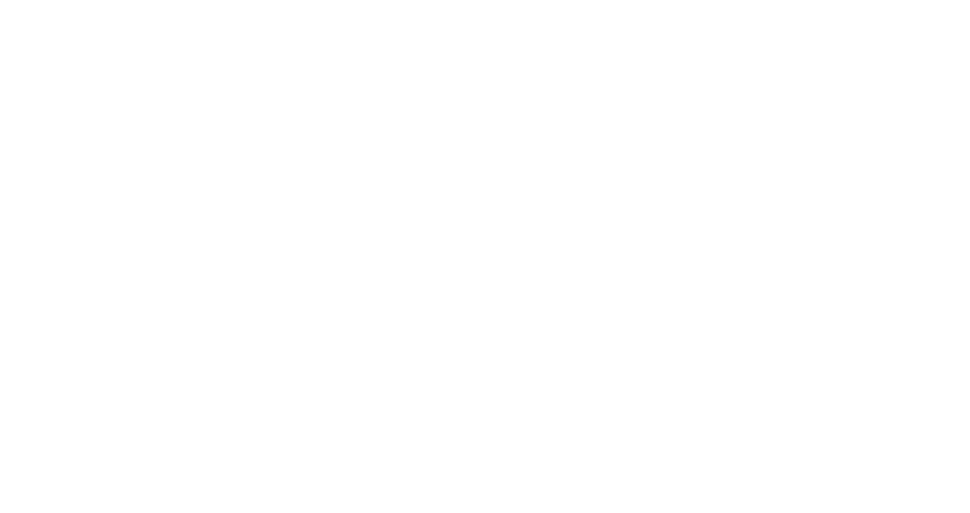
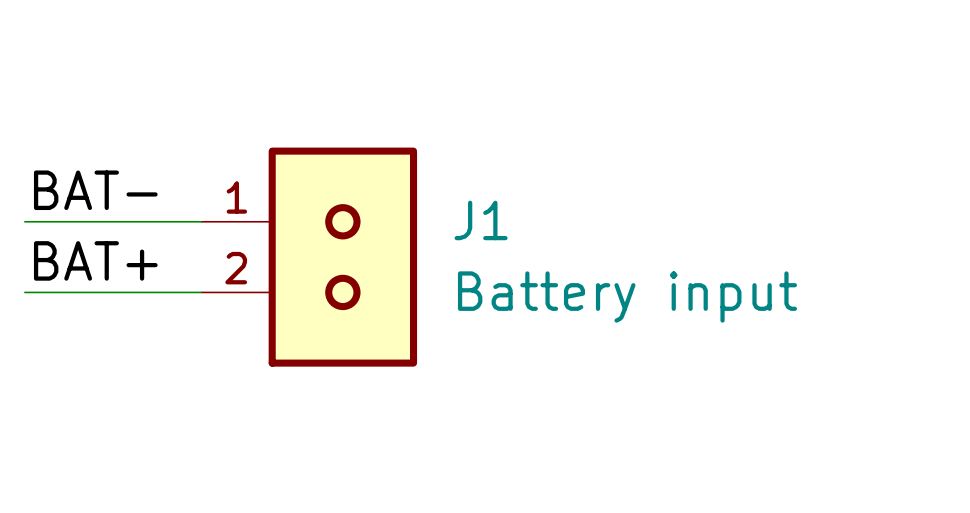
label: none -> BAT- (95, 190)
wire: none -> (24, 221) (201, 221)
J1: none -> Battery input (309, 257)
label: none -> BAT+ (95, 260)
wire: none -> (24, 292) (201, 292)

